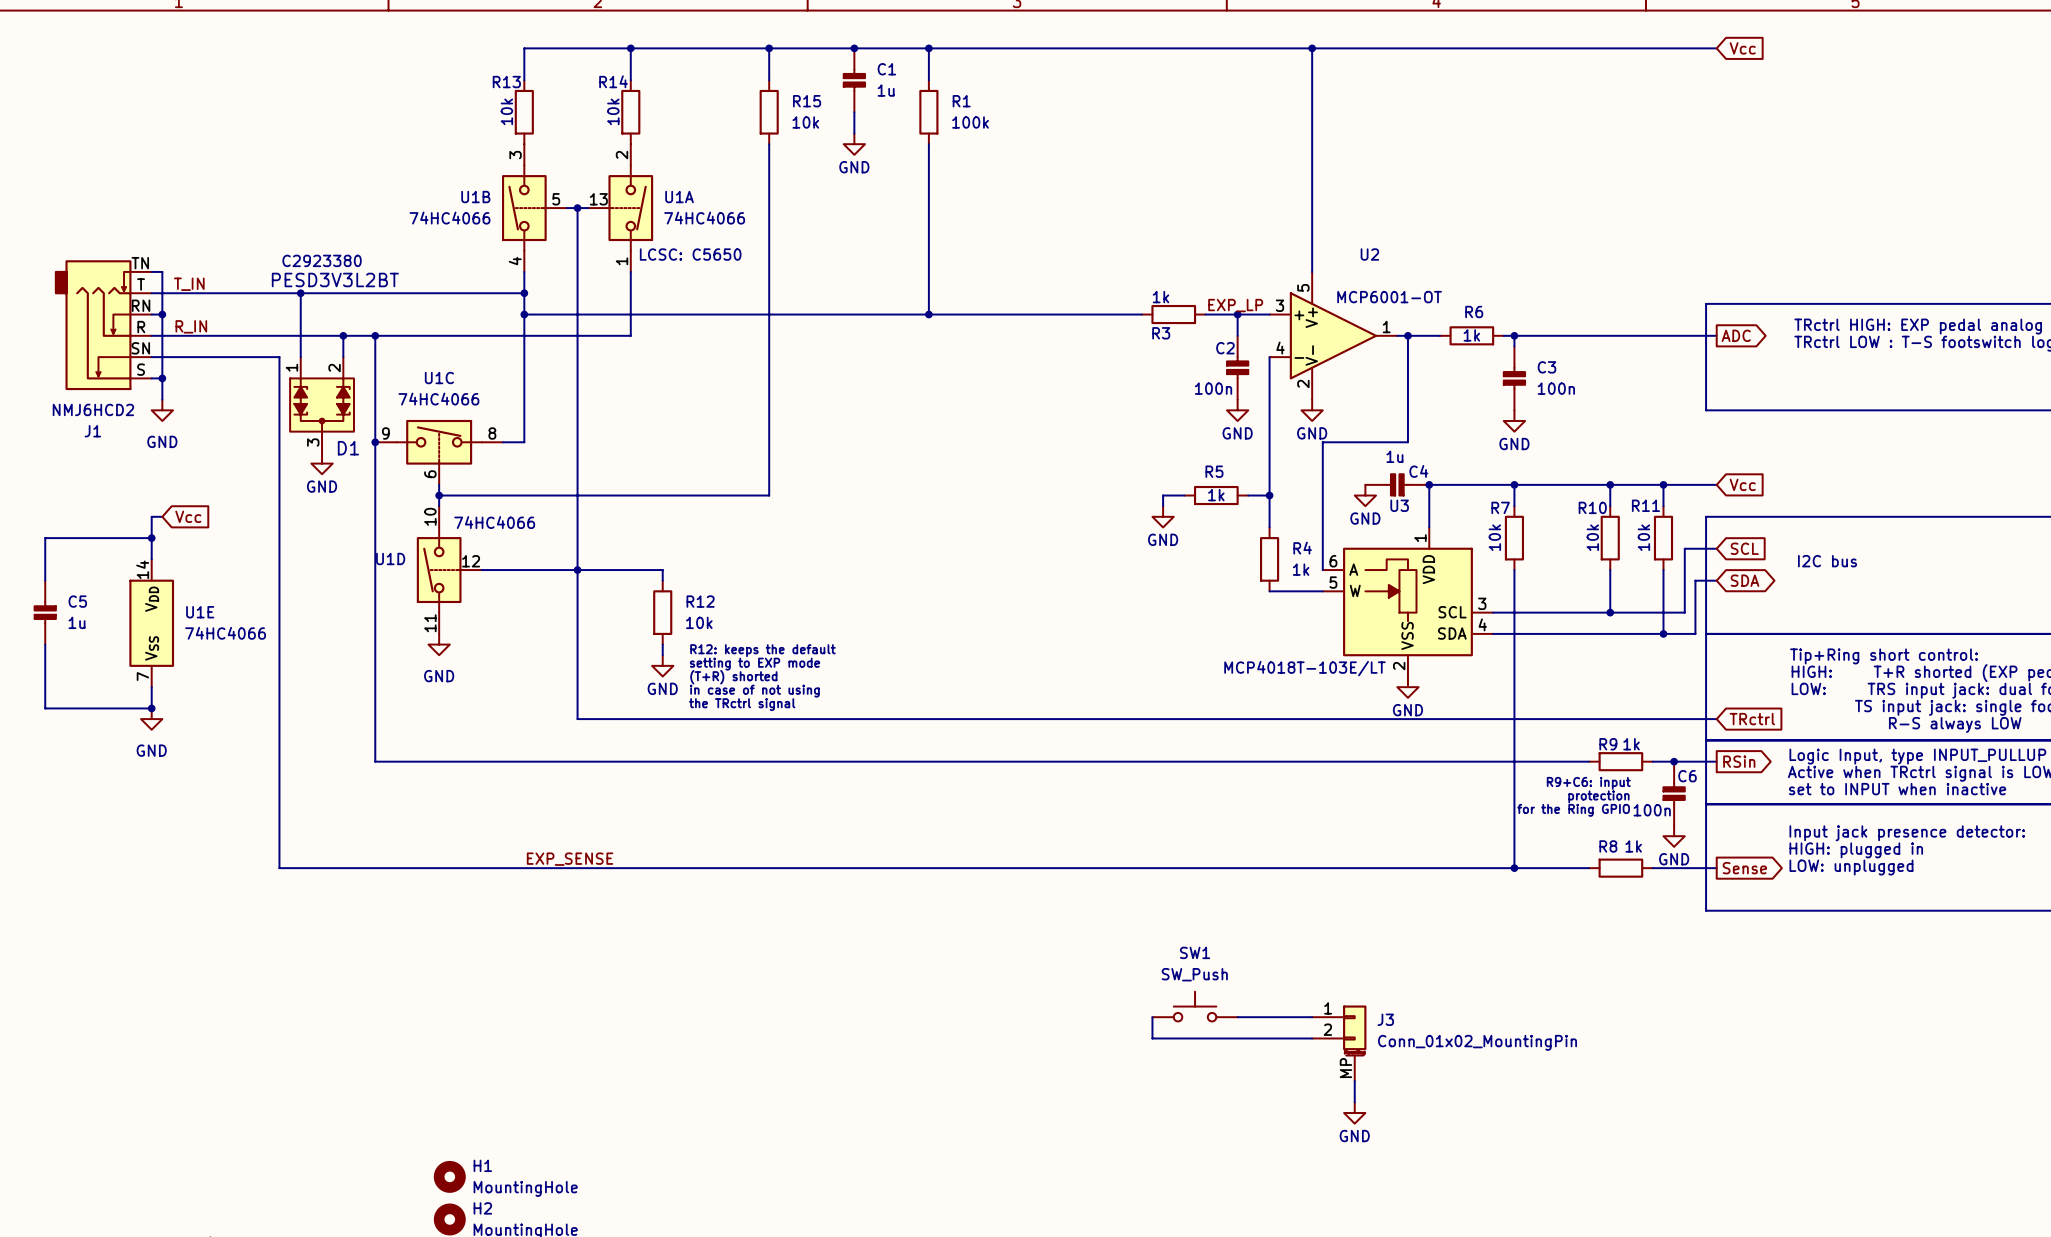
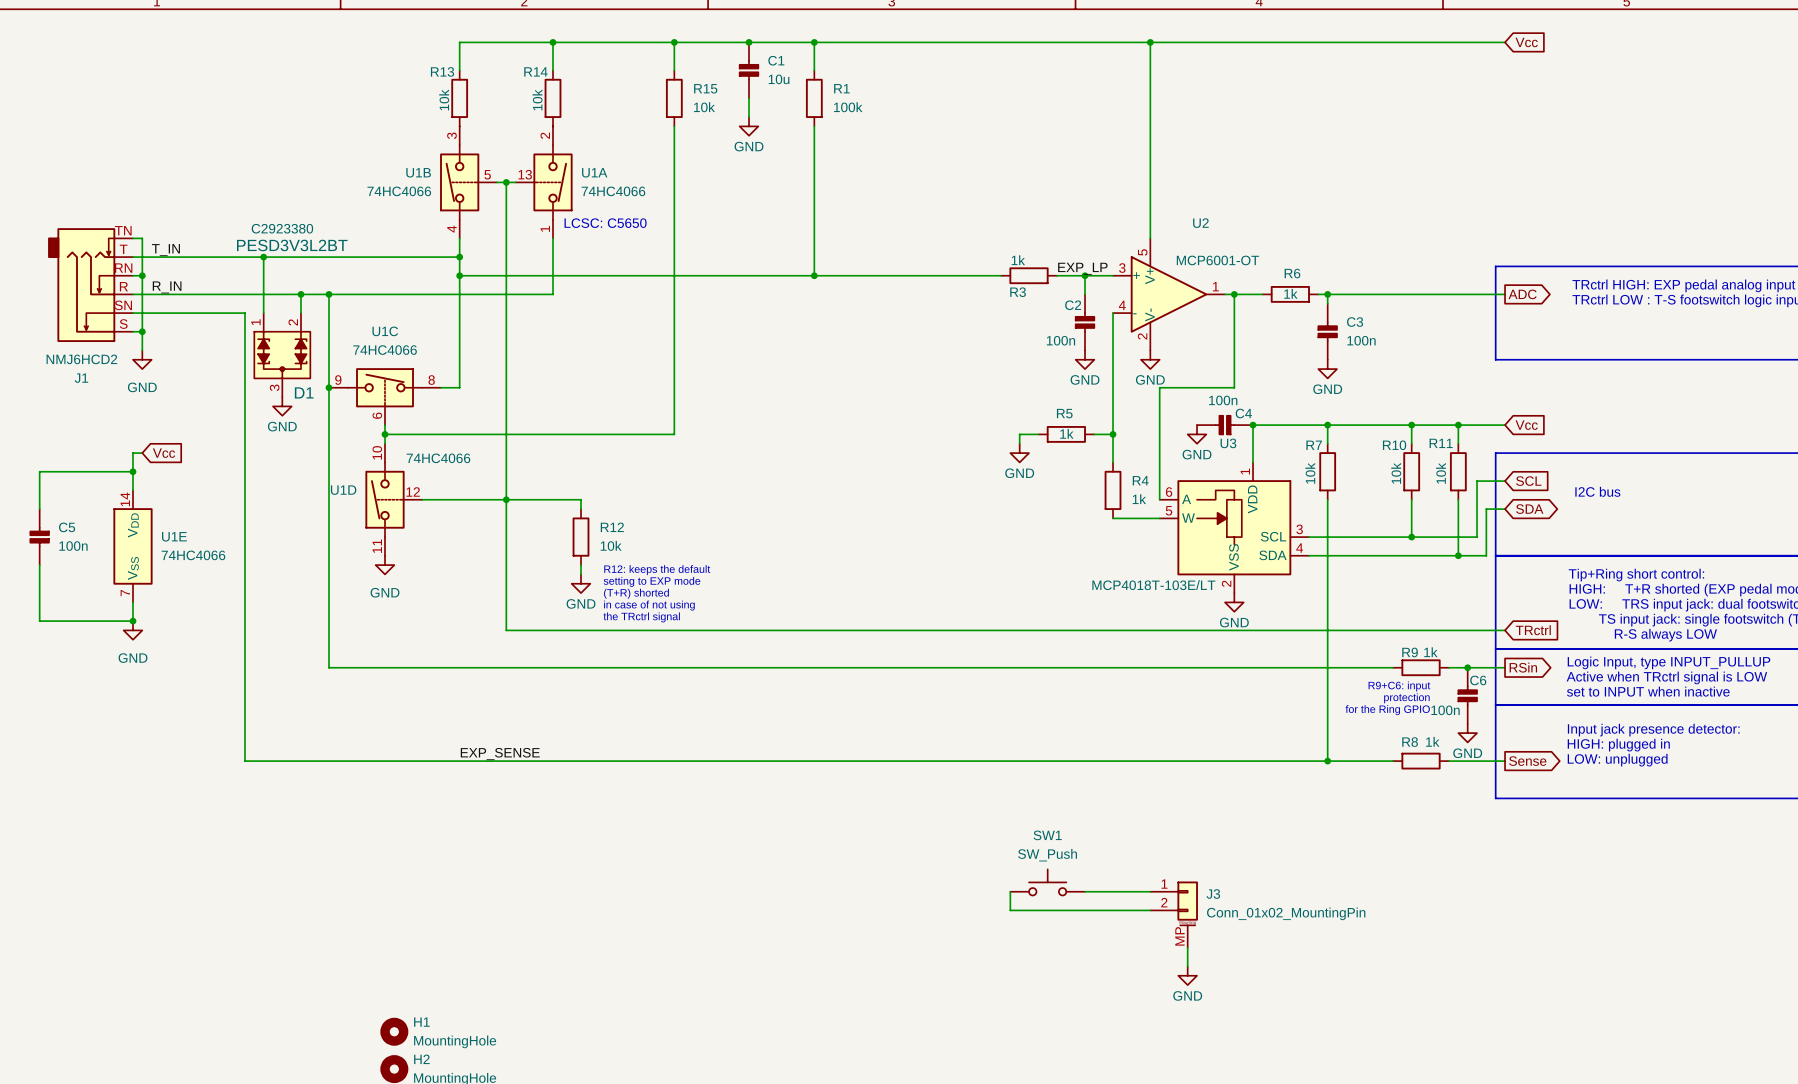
C1 value: 1u (886, 90) -> 10u (779, 79)
C4 value: 1u (1394, 456) -> 100n (1223, 400)
C5 value: 1u (77, 622) -> 100n (73, 546)

